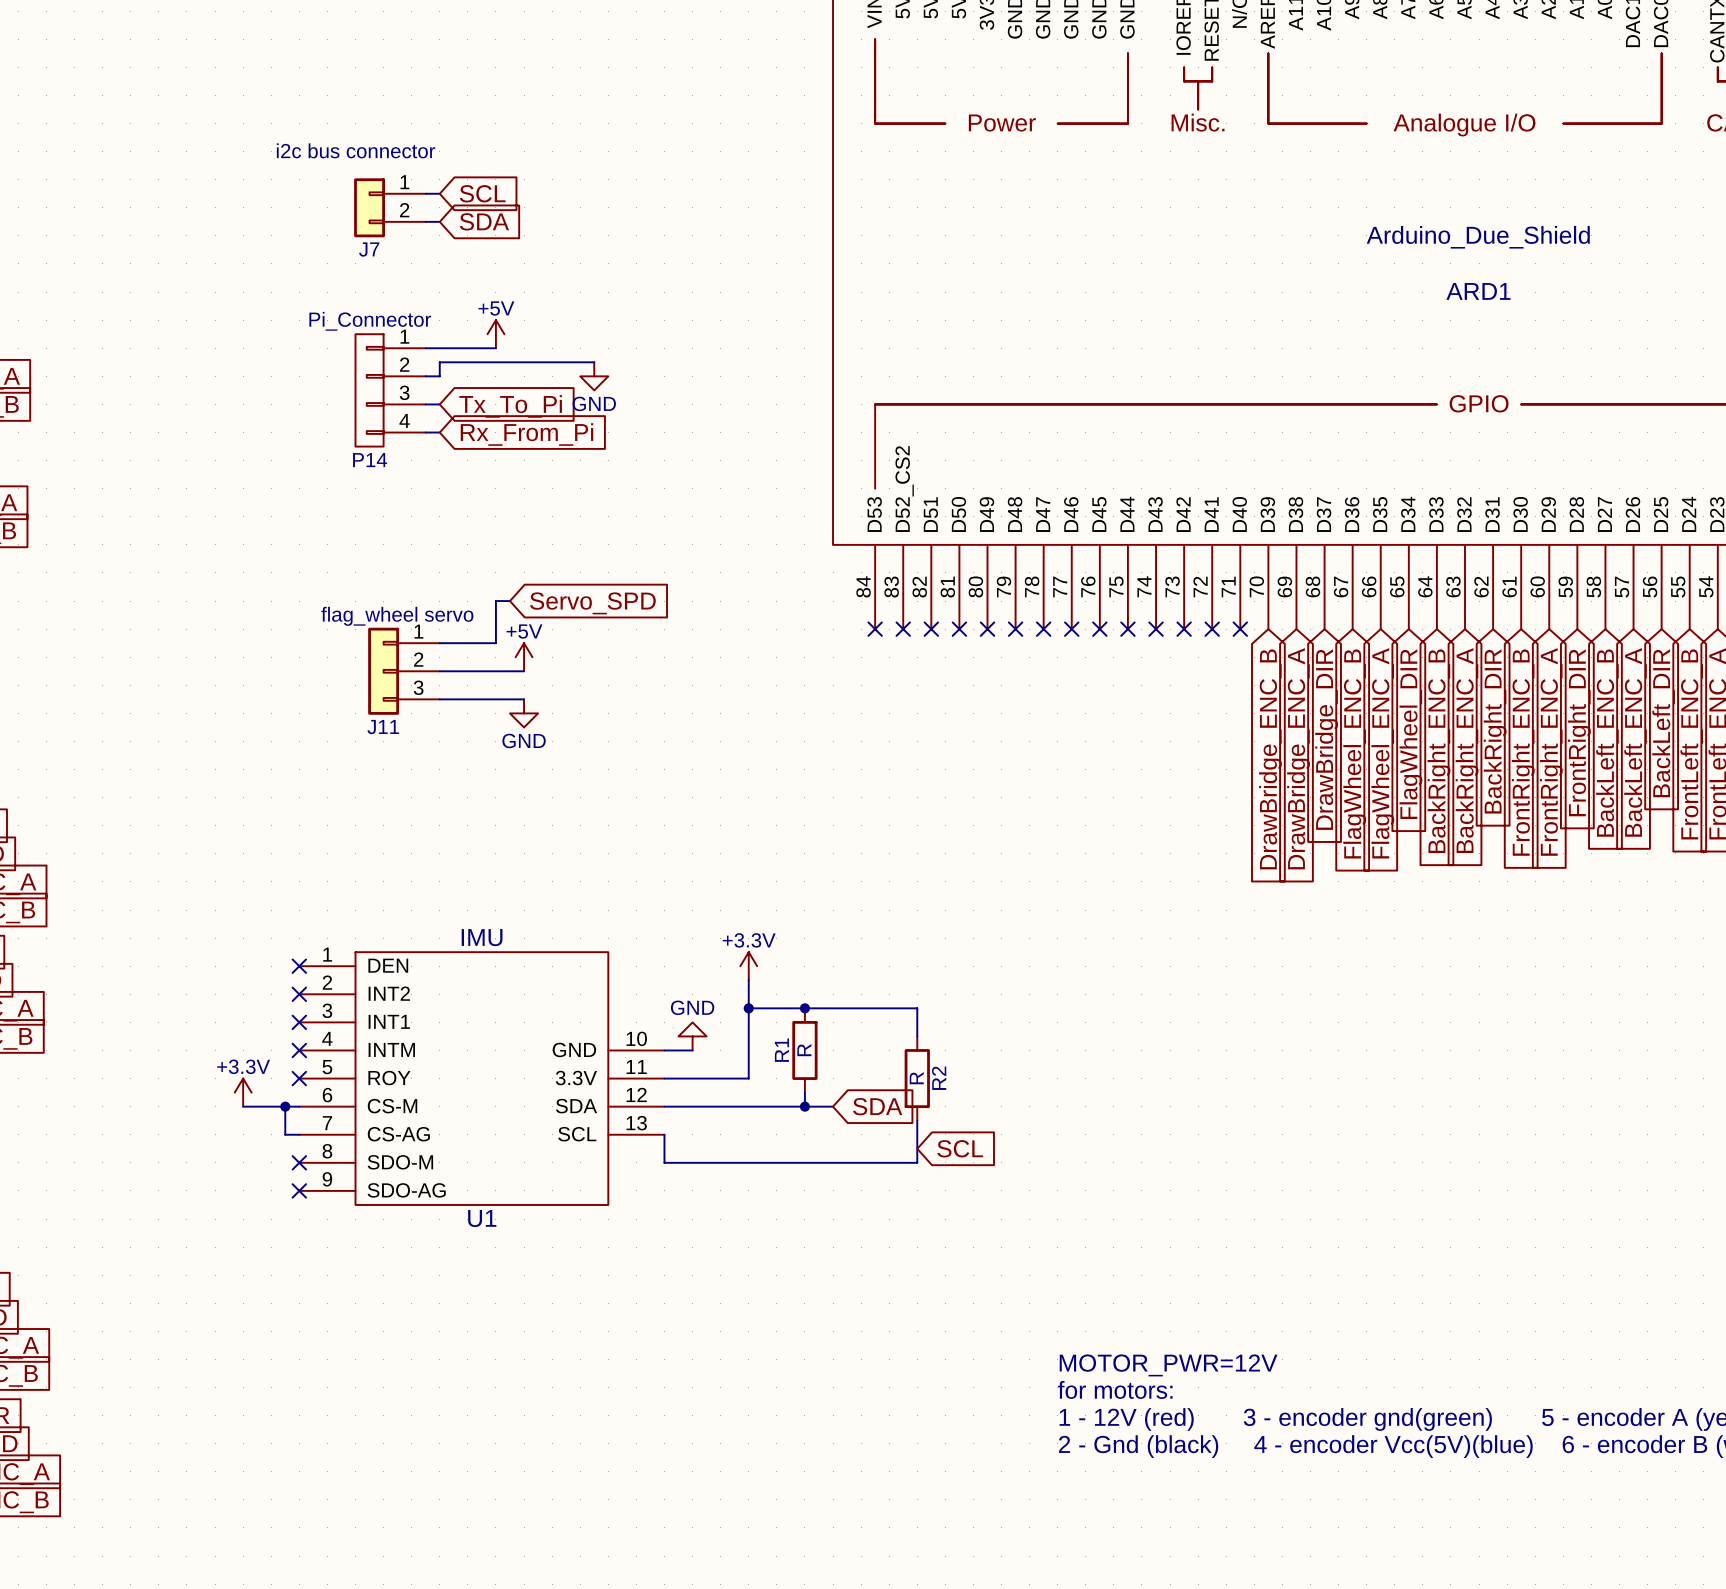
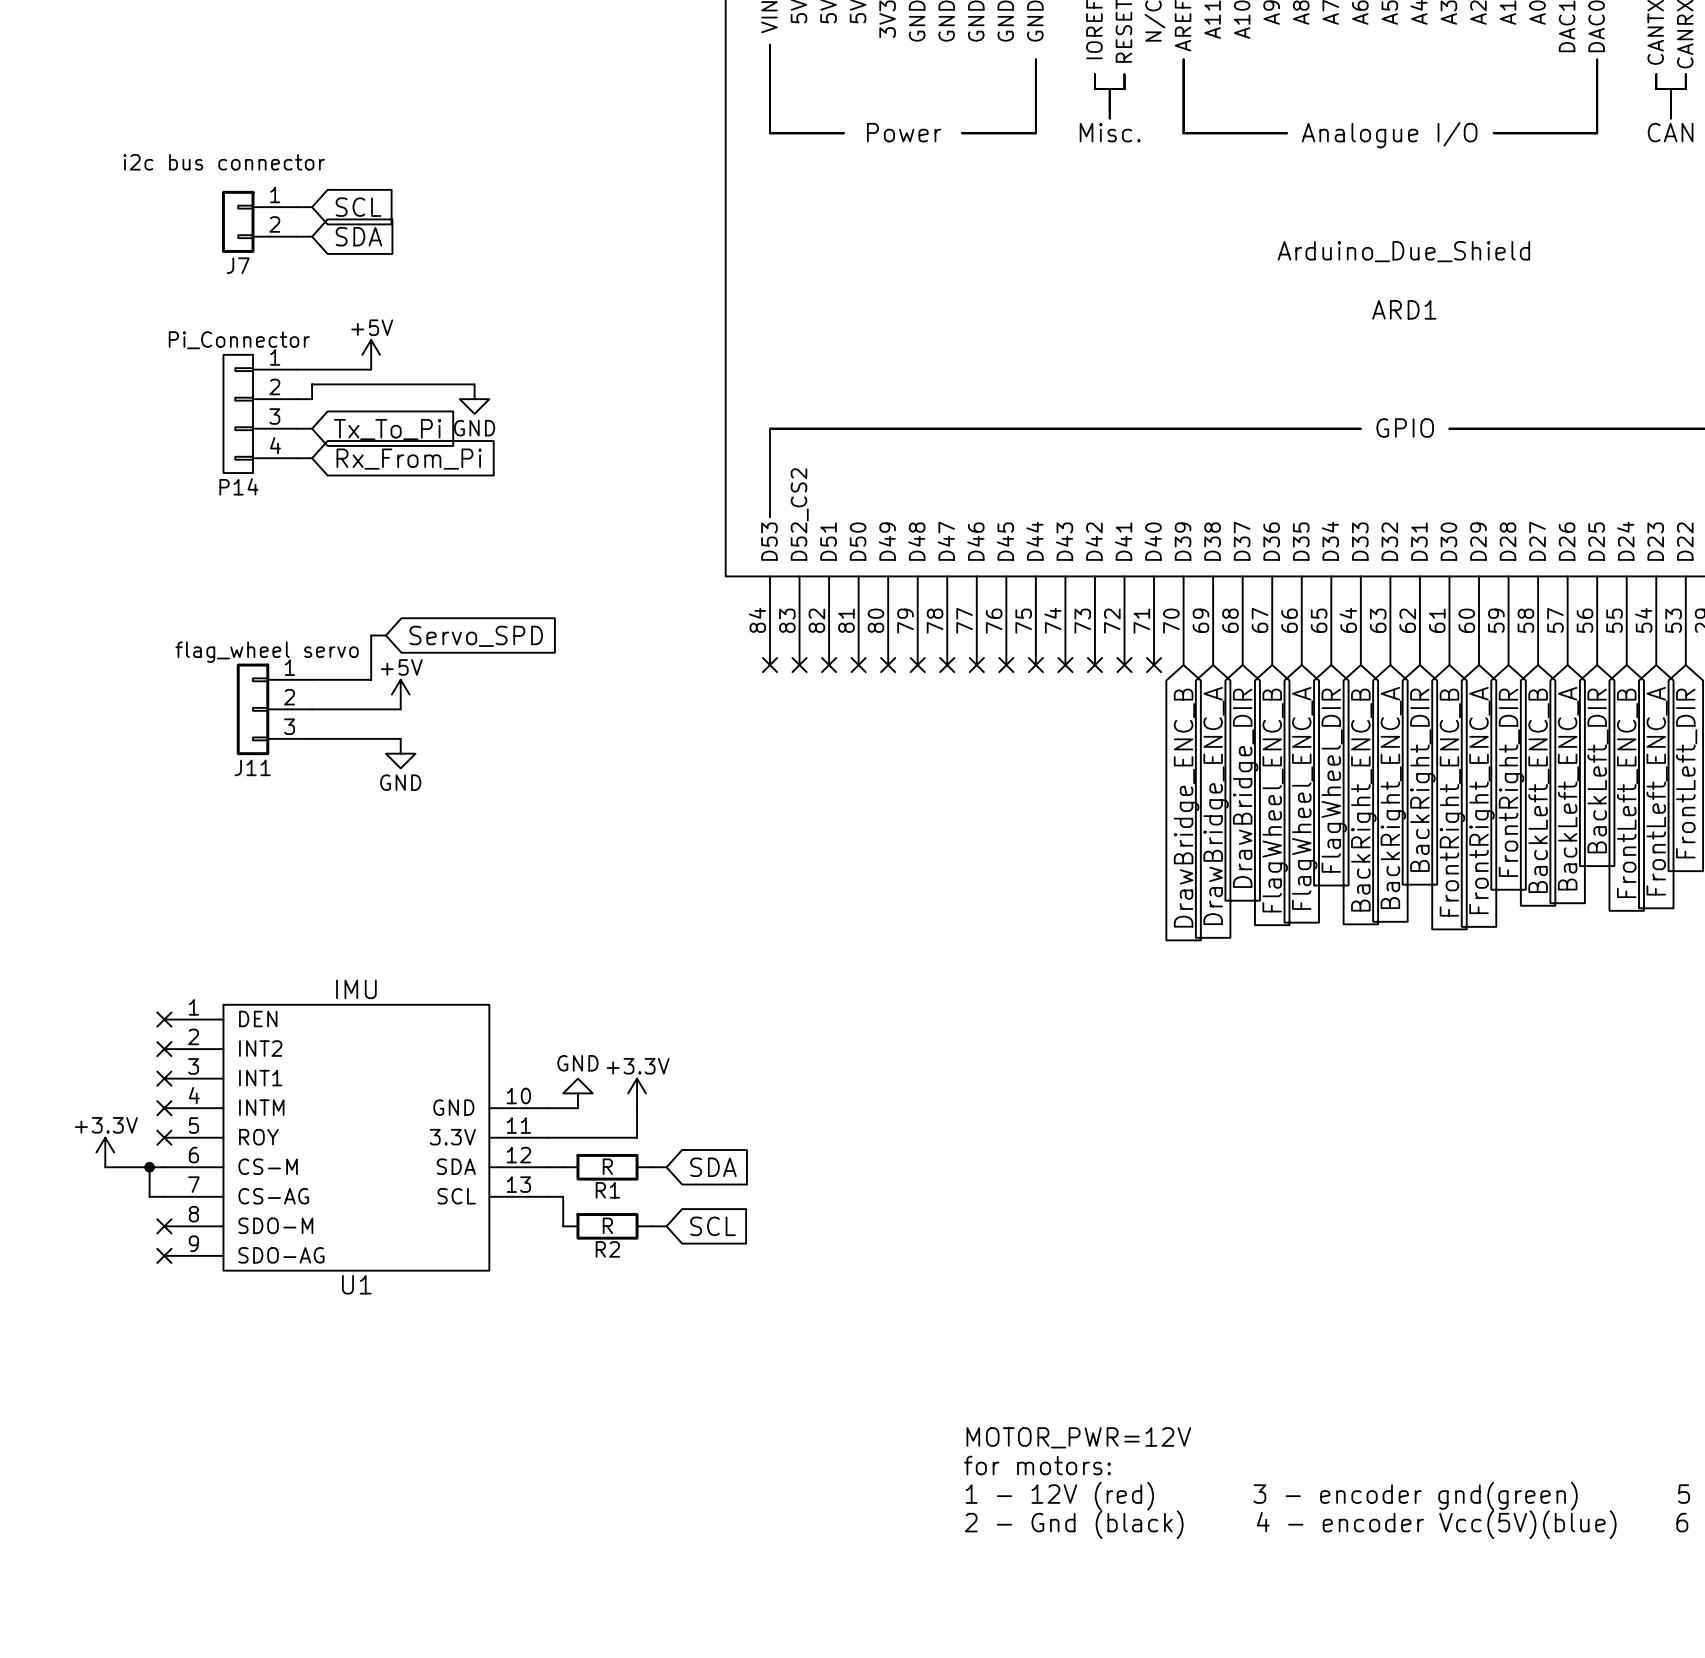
power symbol position: +3.3V (748, 966) -> +3.3V (637, 1093)
wire: (748, 980) (748, 1050) -> none
wire: (748, 1008) (917, 1008) (917, 1036) -> none
junction: (748, 1008) -> none
junction: (804, 1008) -> none
R1 name position: R1 (781, 1050) -> R1 (607, 1190)
R1 rotation: 0° (804, 1050) -> 90° clockwise (607, 1167)
R1 position: (804, 1050) -> (607, 1167)
R2 rotation: 0° (917, 1078) -> 90° clockwise (607, 1226)
R2 position: (917, 1078) -> (607, 1226)
wire: (804, 1092) (804, 1106) -> none
wire: (678, 1106) (762, 1106) -> none
wire: (776, 1106) (833, 1106) -> none
junction: (804, 1106) -> none
global label position: SDA (877, 1106) -> SDA (713, 1167)
wire: (917, 1120) (917, 1162) (776, 1162) -> none
wire: (664, 1134) (664, 1162) (762, 1162) -> (548, 1196) (563, 1196) (563, 1226)
global label position: SCL (960, 1148) -> SCL (713, 1226)

